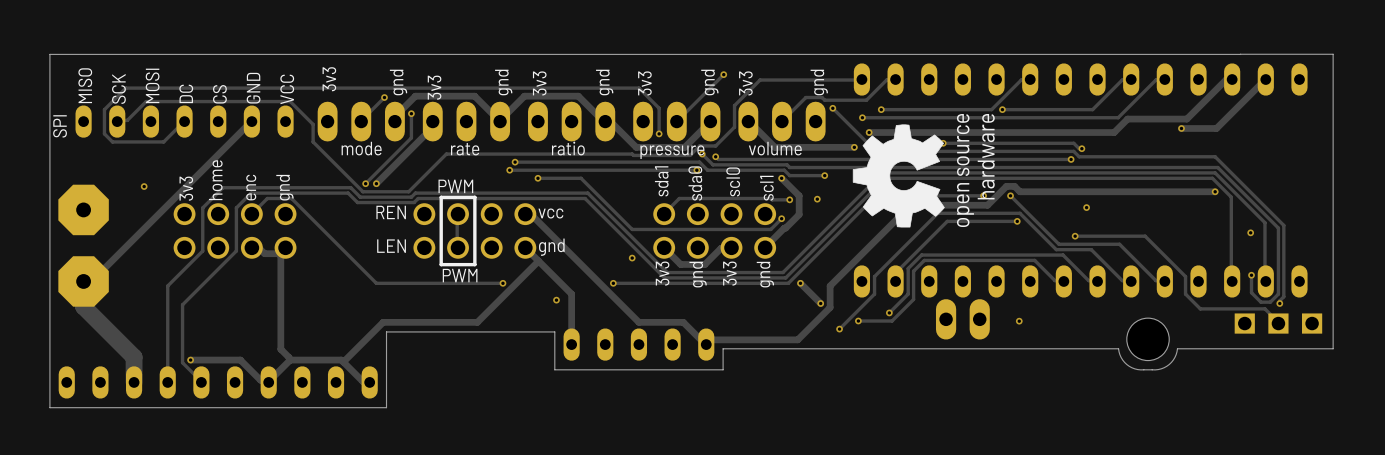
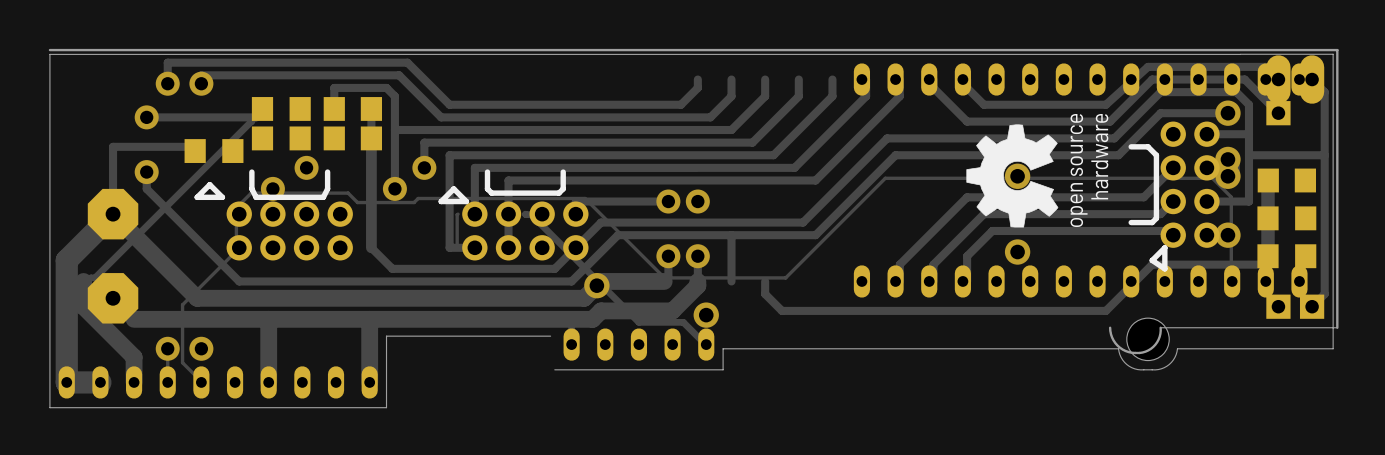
track: (723, 74) (676, 121) -> none
via: (723, 74) -> none
text: 3v3 (329, 79) -> none
track: none -> (697, 79) (697, 87) (681, 104) (449, 104) (407, 62) (167, 62) (167, 83)
track: none -> (731, 79) (731, 96) (710, 117) (441, 117) (399, 75) (201, 75) (201, 83)
track: none -> (765, 79) (765, 96) (731, 130) (394, 130)
track: none -> (798, 79) (798, 96) (752, 142) (424, 142) (424, 167)
track: none -> (832, 79) (832, 96) (773, 155) (449, 155) (449, 247) (474, 247)
track: (861, 79) (760, 80) (734, 105) (734, 127) (715, 145) (699, 145) (690, 155) (446, 154) (408, 191) (362, 191) (313, 141) (313, 124) (290, 101) (146, 101) (127, 120) (117, 121) -> none
track: none -> (866, 79) (866, 96) (794, 167) (474, 167) (474, 214)
track: (895, 79) (886, 80) (866, 100) (824, 100) (822, 97) (805, 97) (781, 121) -> none
track: none -> (899, 79) (899, 96) (815, 180) (508, 180) (508, 247)
track: none -> (933, 79) (933, 87) (967, 121) (1110, 121) (1152, 79) (1244, 79) (1278, 113)
track: (1030, 79) (1021, 80) (991, 109) (881, 109) -> none
track: (1131, 79) (1122, 80) (1092, 109) (1002, 109) -> none
track: (1164, 79) (1155, 80) (1118, 117) (862, 117) -> none
track: (1232, 79) (1225, 80) (1186, 119) (1127, 119) (1114, 132) (869, 132) -> none
track: (1265, 79) (1216, 128) (1181, 128) -> none
track: none -> (1278, 79) (1265, 66) (1148, 66) (1105, 104) (983, 104) (967, 87) (967, 79)
part: none -> (1295, 79)
track: none -> (1312, 79) (1324, 92) (1324, 294) (1312, 306)
text: gnd (398, 82) -> none
text: gnd (503, 82) -> none
text: gnd (604, 82) -> none
text: gnd (709, 82) -> none
text: gnd (819, 82) -> none
via: none -> (167, 83)
via: none -> (201, 83)
text: 3v3 (539, 83) -> none
text: 3v3 (644, 83) -> none
text: 3v3 (745, 83) -> none
text: MISO (85, 85) -> none
text: MOSI (152, 85) -> none
text: 3v3 (434, 87) -> none
text: SCK (118, 88) -> none
text: GND (253, 88) -> none
text: VCC (287, 89) -> none
text: DC (186, 93) -> none
text: CS (219, 94) -> none
track: (384, 97) (361, 121) -> none
via: (384, 97) -> none
part: none -> (281, 108)
track: none -> (334, 108) (334, 87) (386, 87) (394, 96) (394, 188)
part: none -> (352, 108)
track: none -> (371, 108) (371, 247) (392, 268) (554, 268) (601, 222) (803, 222) (887, 138) (1114, 138) (1160, 92) (1236, 92) (1248, 104) (1248, 201) (1206, 201)
track: (832, 108) (875, 151) (1073, 151) (1079, 156) (1215, 156) (1283, 225) (1283, 296) (1279, 303) -> none
via: (832, 108) -> none
via: (881, 109) -> none
via: (1002, 109) -> none
track: none -> (262, 110) (256, 117) (146, 117)
track: (411, 113) (411, 137) (365, 183) -> none
via: (411, 113) -> none
track: none -> (1227, 113) (1160, 113) (1118, 155) (895, 155) (815, 235) (617, 235) (571, 281) (239, 281) (146, 188) (146, 172)
via: none -> (1227, 113)
part: none -> (1278, 113)
via: none -> (146, 117)
via: (862, 117) -> none
track: (184, 121) (163, 141) (112, 141) (104, 133) (104, 109) (126, 88) (638, 88) (659, 108) (659, 133) -> none
part: (184, 121) -> none
part: (361, 121) -> none
track: (432, 121) (431, 128) (376, 183) -> none
part: (466, 121) -> none
part: (571, 121) -> none
part: (676, 121) -> none
track: (710, 121) (684, 147) (636, 147) (612, 123) (602, 120) (578, 96) (524, 96) (500, 121) (474, 96) (415, 96) (395, 116) (394, 121) -> none
track: (748, 121) (774, 147) (854, 147) -> none
part: (781, 121) -> none
text: SPI (60, 126) -> none
via: (1181, 128) -> none
via: (869, 132) -> none
via: (659, 133) -> none
track: none -> (1248, 134) (1206, 134)
part: none -> (281, 138)
part: none -> (352, 138)
track: (943, 143) (1073, 143) (1081, 148) -> none
via: (943, 143) -> none
line: none -> (1131, 146) (1148, 146) (1156, 155) (1156, 218) (1152, 222) (1131, 222)
via: (854, 147) -> none
text: mode (361, 148) -> none
text: ratio (568, 148) -> none
text: volume (775, 148) -> none
via: (1081, 148) -> none
text: rate (465, 149) -> none
track: none -> (195, 151) (192, 153) (188, 146) (113, 146) (113, 214)
part: none -> (214, 151)
text: pressure (672, 152) -> none
track: (702, 154) (712, 164) (787, 164) (789, 167) (1217, 167) (1278, 228) (1278, 294) (1270, 302) (1260, 302) (1251, 292) (1251, 275) -> none
via: (702, 154) -> none
track: none -> (1324, 155) (1248, 155)
track: (715, 156) (718, 159) (1071, 159) -> none
via: (715, 156) -> none
via: (1071, 159) -> none
via: none -> (1227, 159)
track: (515, 162) (699, 162) (707, 170) (784, 170) (789, 175) (824, 175) -> none
via: (515, 162) -> none
via: none -> (306, 167)
via: none -> (424, 167)
track: none -> (1173, 167) (1143, 197) (967, 197) (899, 264) (899, 281)
via: (509, 170) -> none
via: (696, 170) -> none
via: none -> (146, 172)
line: none -> (327, 172) (327, 188) (323, 197) (256, 197) (251, 188) (251, 172)
line: none -> (563, 172) (563, 188) (559, 193) (491, 193) (487, 188) (487, 172)
via: (824, 175) -> none
drawing position: (898, 175) -> (1012, 175)
via: none -> (1017, 176)
via: none -> (1227, 176)
track: none -> (1268, 176) (1268, 258) (1261, 264) (1152, 264) (1105, 310) (781, 310) (765, 294) (765, 281)
track: (537, 178) (581, 178) (632, 229) (770, 229) (781, 218) -> none
via: (537, 178) -> none
track: (781, 178) (799, 195) (799, 214) (765, 247) -> none
via: (781, 178) -> none
text: home (215, 180) -> none
part: none -> (1286, 180)
text: sda1 (661, 181) -> none
text: scl0 (733, 181) -> none
via: (365, 183) -> none
via: (376, 183) -> none
text: sda0 (695, 183) -> none
line: none -> (209, 184) (222, 197) (197, 197) (209, 184)
part: none -> (1190, 184)
via: (144, 186) -> none
text: PWM (455, 186) -> none
text: enc (251, 187) -> none
text: gnd (284, 187) -> none
text: 3v3 (186, 188) -> none
via: none -> (272, 188)
via: none -> (394, 188)
line: none -> (453, 188) (466, 201) (441, 201) (453, 188)
text: scl1 (766, 188) -> none
track: (1215, 191) (1019, 191) (1014, 186) (1006, 186) (987, 205) (910, 205) (830, 286) (830, 307) (797, 339) (710, 339) (706, 343) -> none
via: (1215, 191) -> none
track: (983, 195) (875, 195) (788, 283) (613, 283) -> none
via: (983, 195) -> none
track: (1010, 195) (1058, 244) (1119, 244) (1155, 280) (1164, 281) -> none
via: (1010, 195) -> none
line: (474, 197) (474, 264) (441, 264) (441, 197) (474, 197) -> none
track: (789, 199) (679, 198) (664, 214) -> none
via: (789, 199) -> none
via: (817, 199) -> none
track: none -> (668, 201) (575, 201) (575, 214)
via: none -> (668, 201)
via: none -> (697, 201)
track: none -> (1173, 201) (1160, 214) (983, 214) (933, 264) (933, 281)
via: (1086, 207) -> none
part position: (83, 209) -> (113, 214)
text: REN (391, 212) -> none
text: vcc (550, 213) -> none
track: none -> (113, 214) (66, 260) (66, 382) (100, 382)
track: none -> (113, 214) (197, 298) (584, 298) (601, 281) (664, 281) (668, 277) (668, 256)
track: (251, 214) (267, 198) (291, 198) (376, 283) (502, 283) -> none
via: (781, 218) -> none
part: none -> (1286, 218)
track: (1017, 221) (947, 221) (896, 272) (895, 281) -> none
via: (1017, 221) -> none
part: (235, 230) -> none
part: none -> (289, 230)
part: (474, 230) -> none
part: none -> (525, 230)
part: (714, 230) -> none
via: (1250, 232) -> none
track: none -> (731, 235) (731, 281)
track: none -> (1173, 235) (1169, 230) (992, 230) (967, 256) (967, 281)
via: none -> (1227, 235)
track: (1075, 236) (1145, 236) (1185, 276) (1185, 294) (1200, 308) (1264, 308) (1278, 323) -> none
via: (1075, 236) -> none
text: LEN (391, 246) -> none
track: (251, 247) (259, 248) (264, 253) (279, 253) (285, 247) (280, 256) (280, 349) (290, 360) -> none
track: (525, 247) (571, 294) (571, 319) -> none
text: gnd (551, 247) -> none
track: (731, 247) (721, 248) (704, 264) (680, 264) (664, 247) -> none
line: none -> (1164, 247) (1152, 260) (1164, 268) (1164, 247)
via: none -> (1017, 252)
via: none -> (668, 256)
track: none -> (697, 256) (697, 285) (672, 310) (601, 310) (592, 319) (134, 319)
via: none -> (697, 256)
part: none -> (1286, 256)
via: (632, 258) -> none
track: (538, 261) (477, 322) (383, 322) (343, 362) -> none
text: 3v3 (662, 273) -> none
text: 3v3 (729, 273) -> none
text: gnd (698, 274) -> none
text: gnd (765, 274) -> none
text: PWM (460, 275) -> none
via: (1251, 275) -> none
part position: (83, 281) -> (113, 298)
track: (1063, 281) (1054, 280) (1034, 260) (924, 260) (913, 271) (913, 299) (892, 321) (858, 321) -> none
track: (1097, 281) (1088, 280) (1063, 255) (921, 255) (908, 268) (908, 294) (889, 312) -> none
track: (1131, 281) (1122, 280) (1091, 249) (1056, 249) (1019, 213) (937, 213) (874, 276) (874, 294) (839, 329) -> none
track: (1265, 281) (1264, 222) (1215, 172) (882, 172) (783, 272) (667, 272) (587, 193) (415, 193) (411, 197) (360, 197) (350, 187) (222, 187) (202, 207) (202, 251) (167, 286) (167, 348) -> none
via: (502, 283) -> none
via: (613, 283) -> none
track: (800, 283) (820, 303) -> none
via: (800, 283) -> none
via: none -> (596, 285)
via: (556, 300) -> none
via: (820, 303) -> none
via: (1279, 303) -> none
part: none -> (1278, 306)
part: none -> (1312, 306)
via: (889, 312) -> none
via: none -> (706, 315)
part: (962, 319) -> none
via: (858, 321) -> none
via: (1019, 321) -> none
part: (1244, 323) -> none
part: (1278, 323) -> none
part: (1312, 323) -> none
board edge: none -> (1337, 327) (1337, 50) (49, 50) (1337, 50) (1337, 327)
board edge: none -> (1337, 327) (1160, 327) (1158, 339) (1153, 346) (1145, 351) (1135, 352)
via: (839, 329) -> none
board edge: (386, 336) (386, 331) (554, 331) (554, 369) -> (386, 336) (550, 336)
via: none -> (167, 348)
via: none -> (201, 348)
board edge: none -> (1135, 352) (1125, 351) (1117, 345) (1112, 337) (1110, 327) (1111, 334) (1112, 337) (1113, 340) (1117, 345) (1122, 349) (1125, 351) (1128, 352) (1135, 352)
track: (190, 360) (240, 360) (260, 380) (268, 382) -> none
via: (190, 360) -> none
track: (290, 360) (268, 381) -> (268, 319) (268, 381)
track: (290, 360) (341, 360) (362, 381) (369, 381) -> (369, 319) (369, 381)

